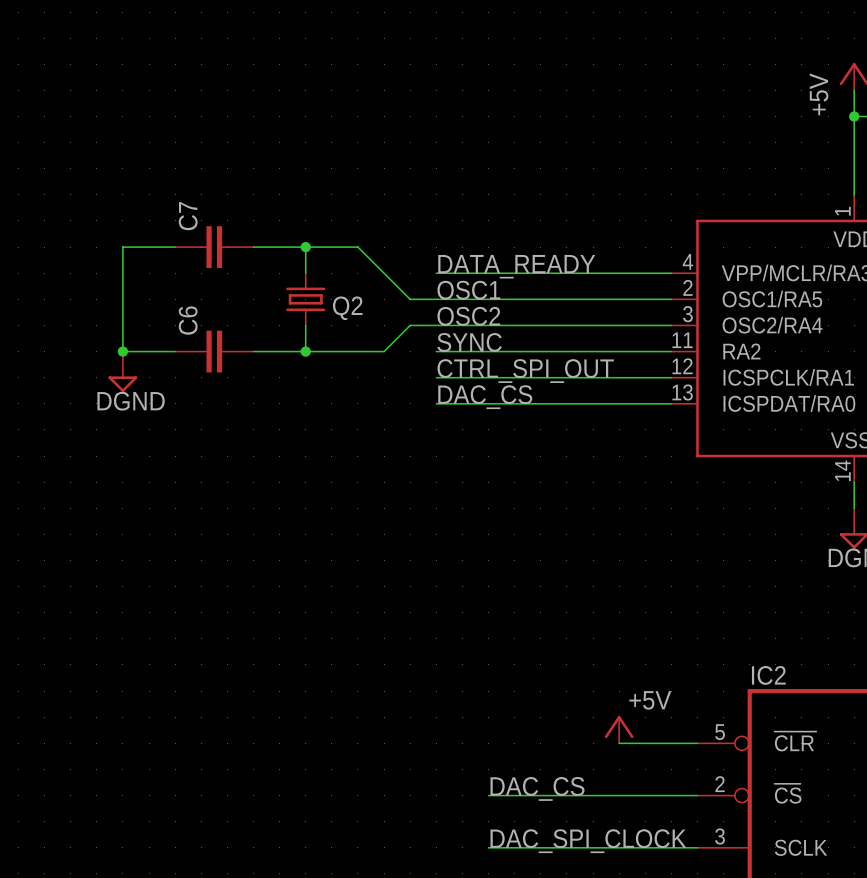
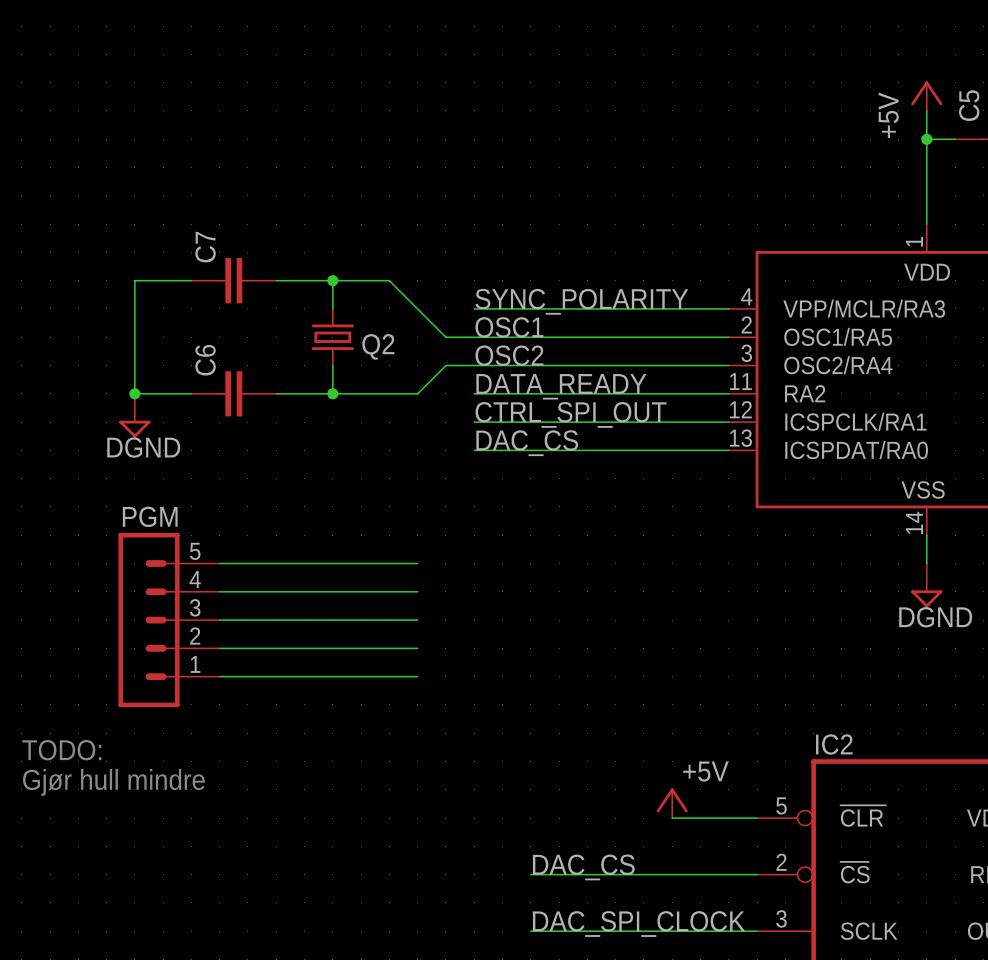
label: DATA_READY (516, 266) -> SYNC_POLARITY (581, 301)
label: SYNC (469, 342) -> DATA_READY (561, 386)
wire: none -> (219, 563) (417, 563)
wire: none -> (219, 591) (417, 591)
PGM: none -> (169, 620)
wire: none -> (219, 620) (417, 620)
wire: none -> (219, 648) (417, 648)
wire: none -> (219, 676) (417, 676)
text: none -> TODO: (61, 750)
text: none -> Gjør hull mindre (113, 782)

